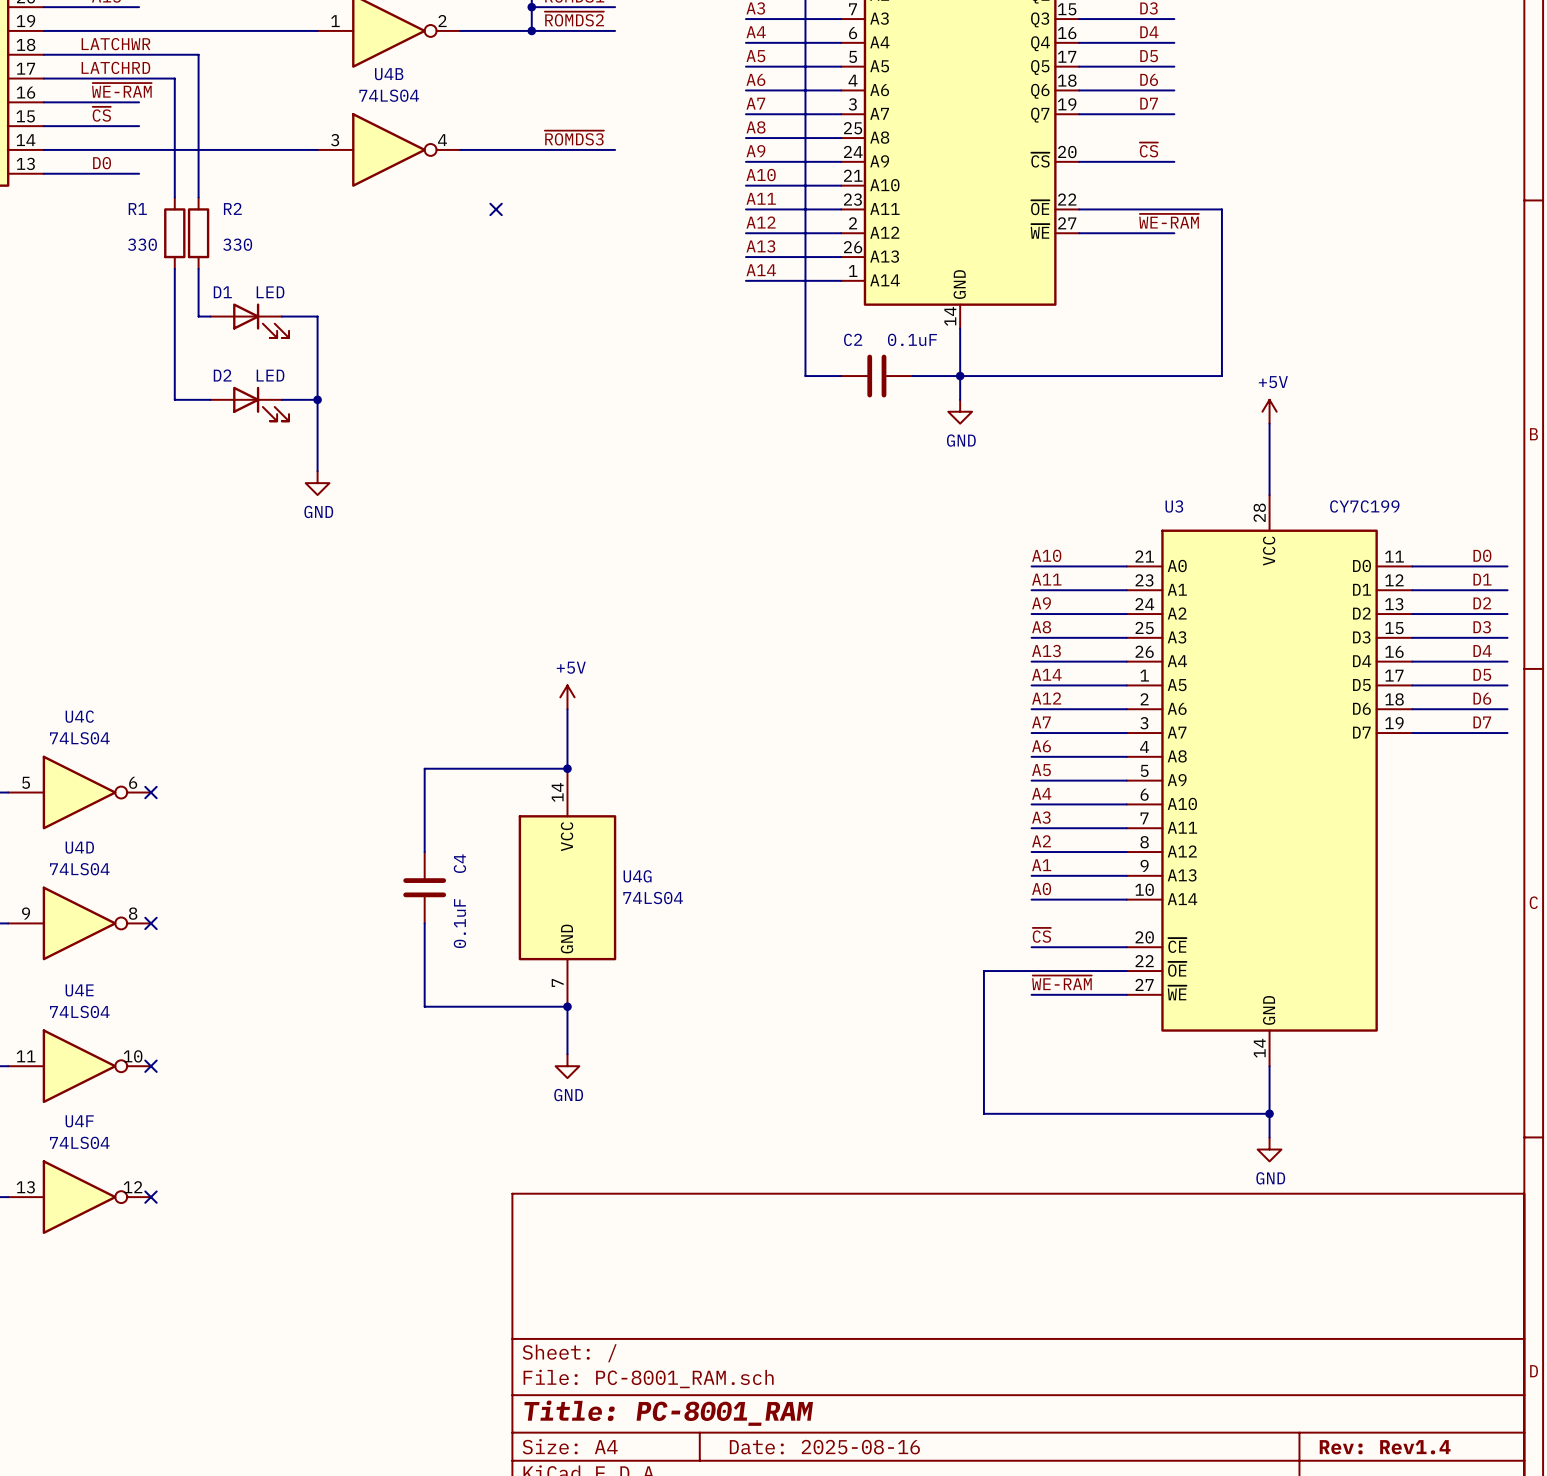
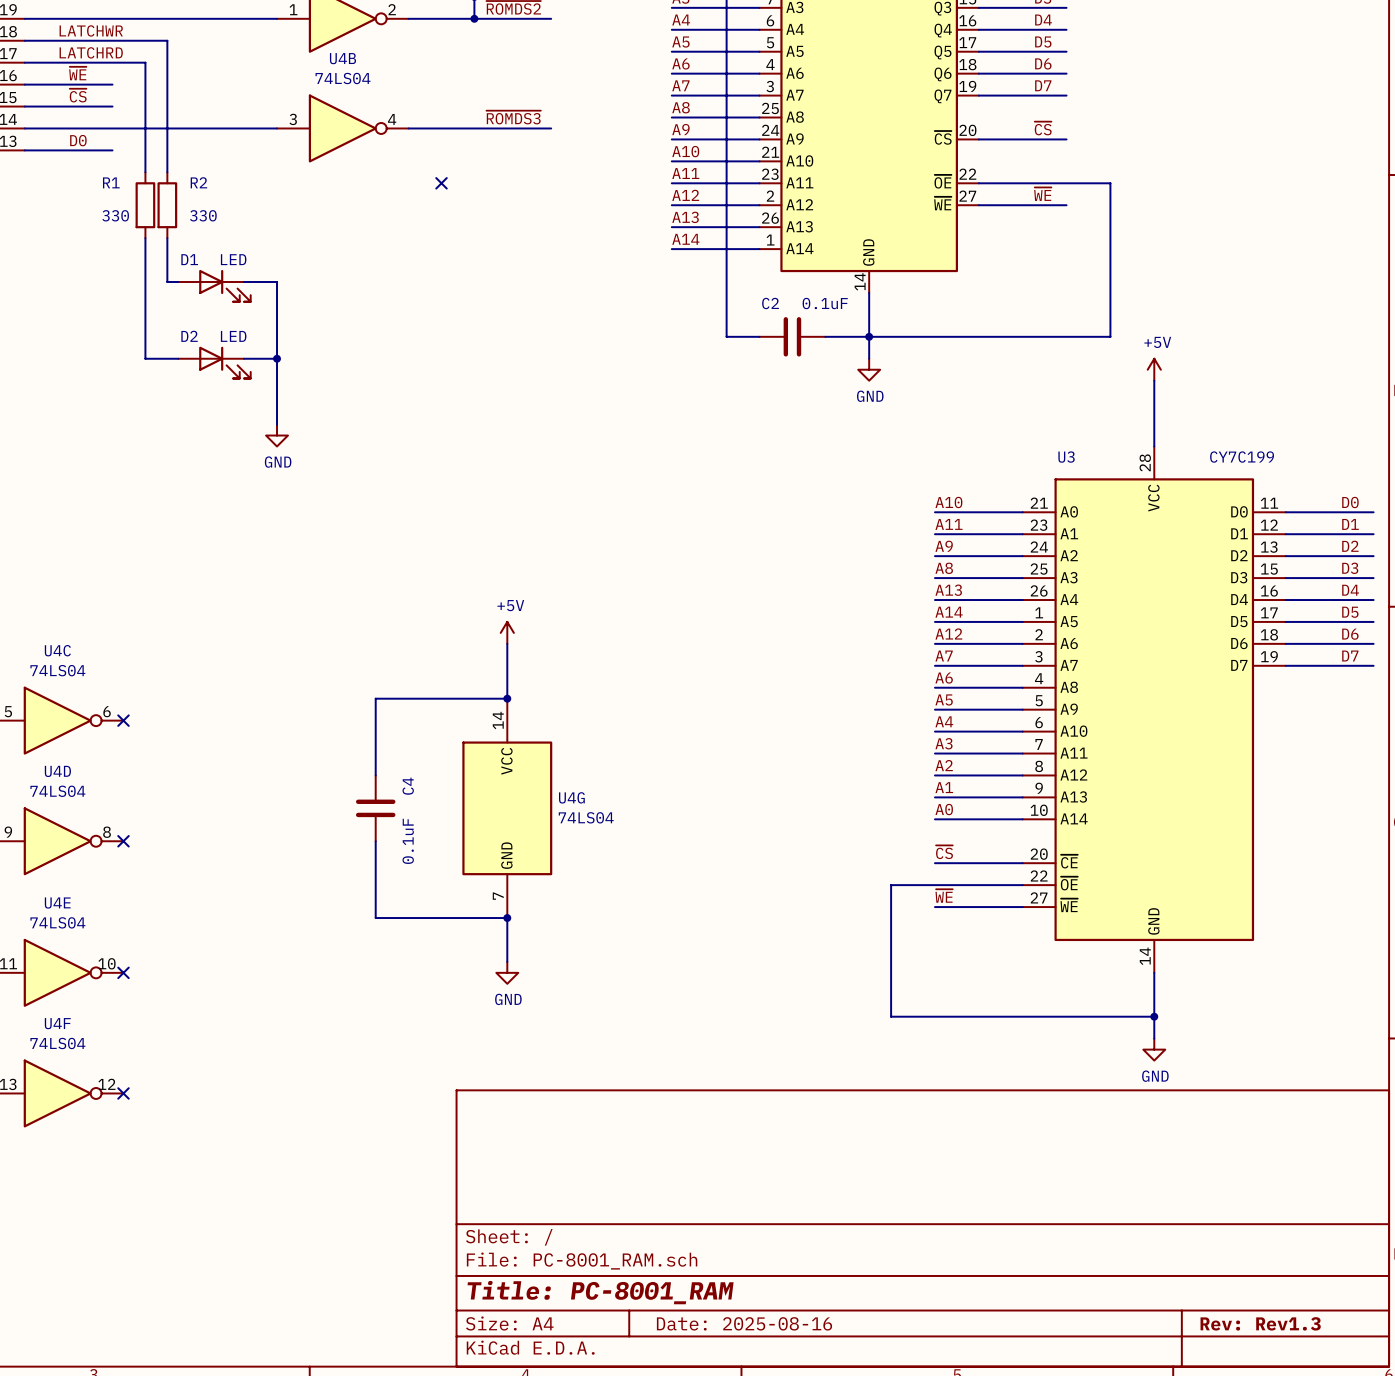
label: ~{WE-RAM} (121, 90) -> ~{WE} (77, 73)
label: ~{WE-RAM} (1169, 221) -> ~{WE} (1042, 194)
label: ~{WE-RAM} (1061, 982) -> ~{WE} (944, 896)
title block: Rev: Rev1.4 (1385, 1447) -> Rev: Rev1.3 (1260, 1323)

